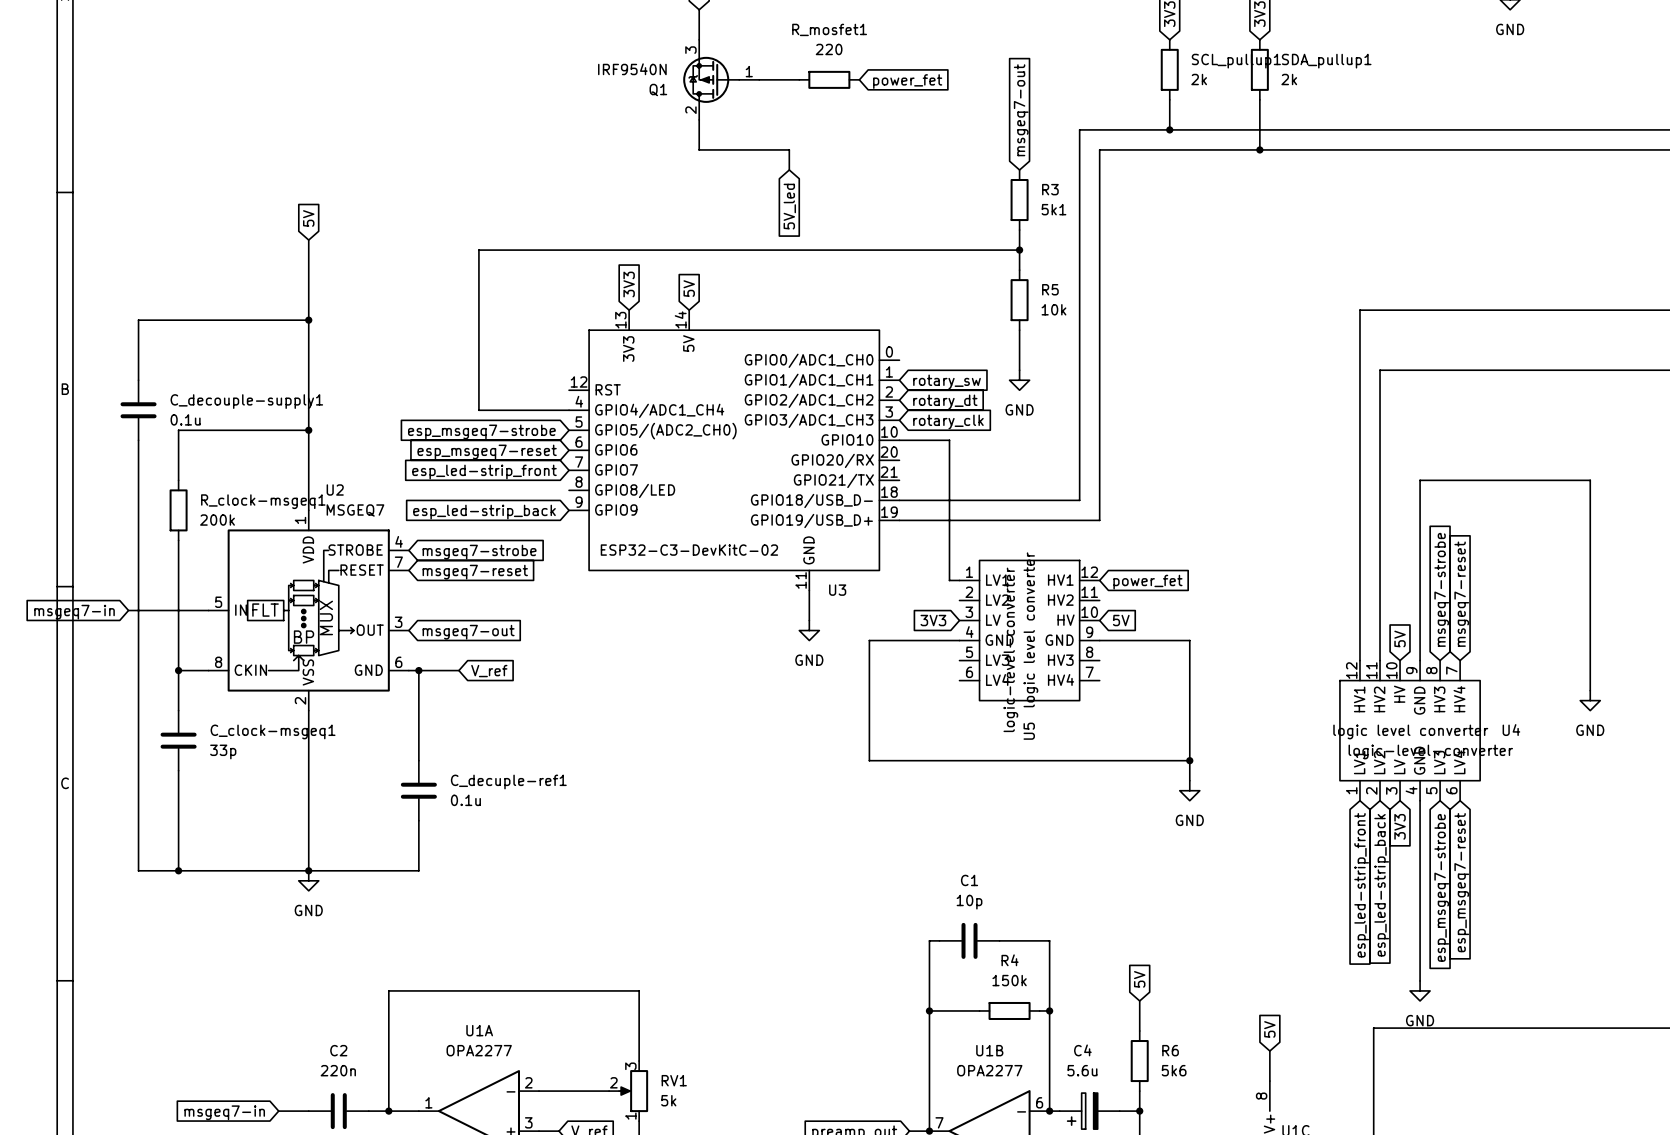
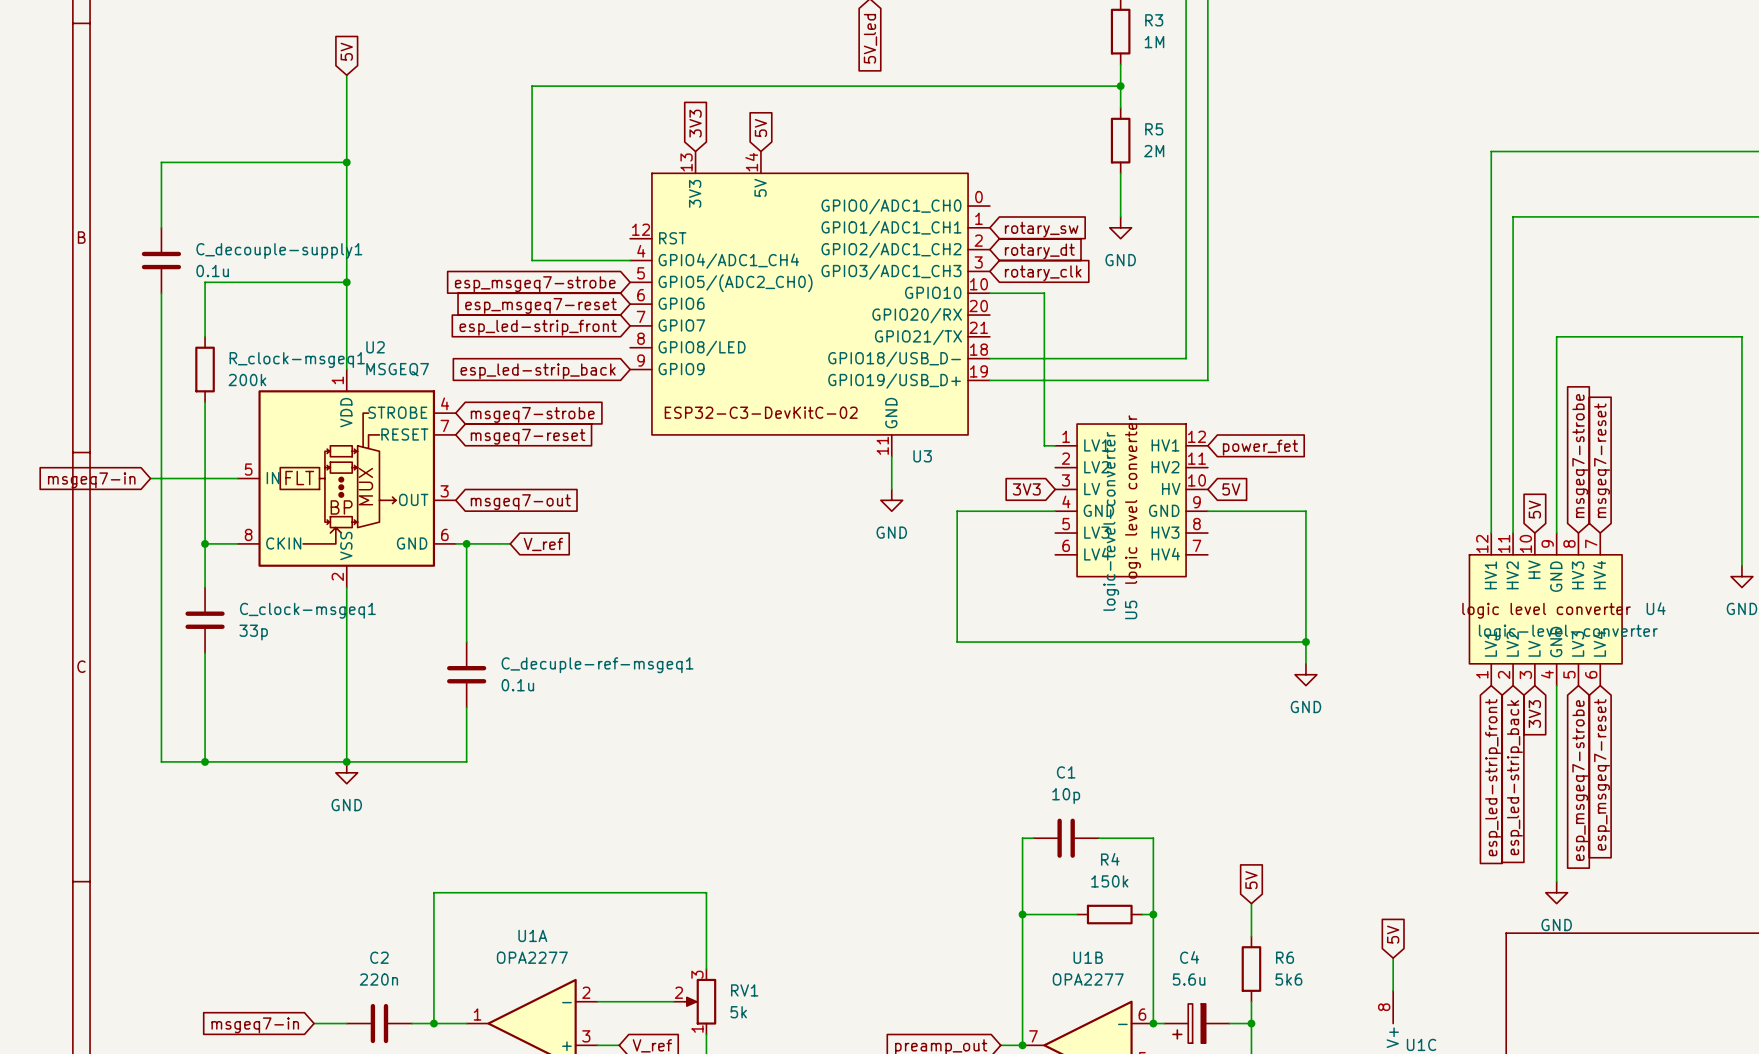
R3 value: 5k1 (1053, 209) -> 1M (1154, 42)
R5 value: 10k (1053, 309) -> 2M (1154, 151)
C_decuple-ref1 name: C_decuple-ref1 (508, 782) -> C_decuple-ref-msgeq1 (597, 665)

